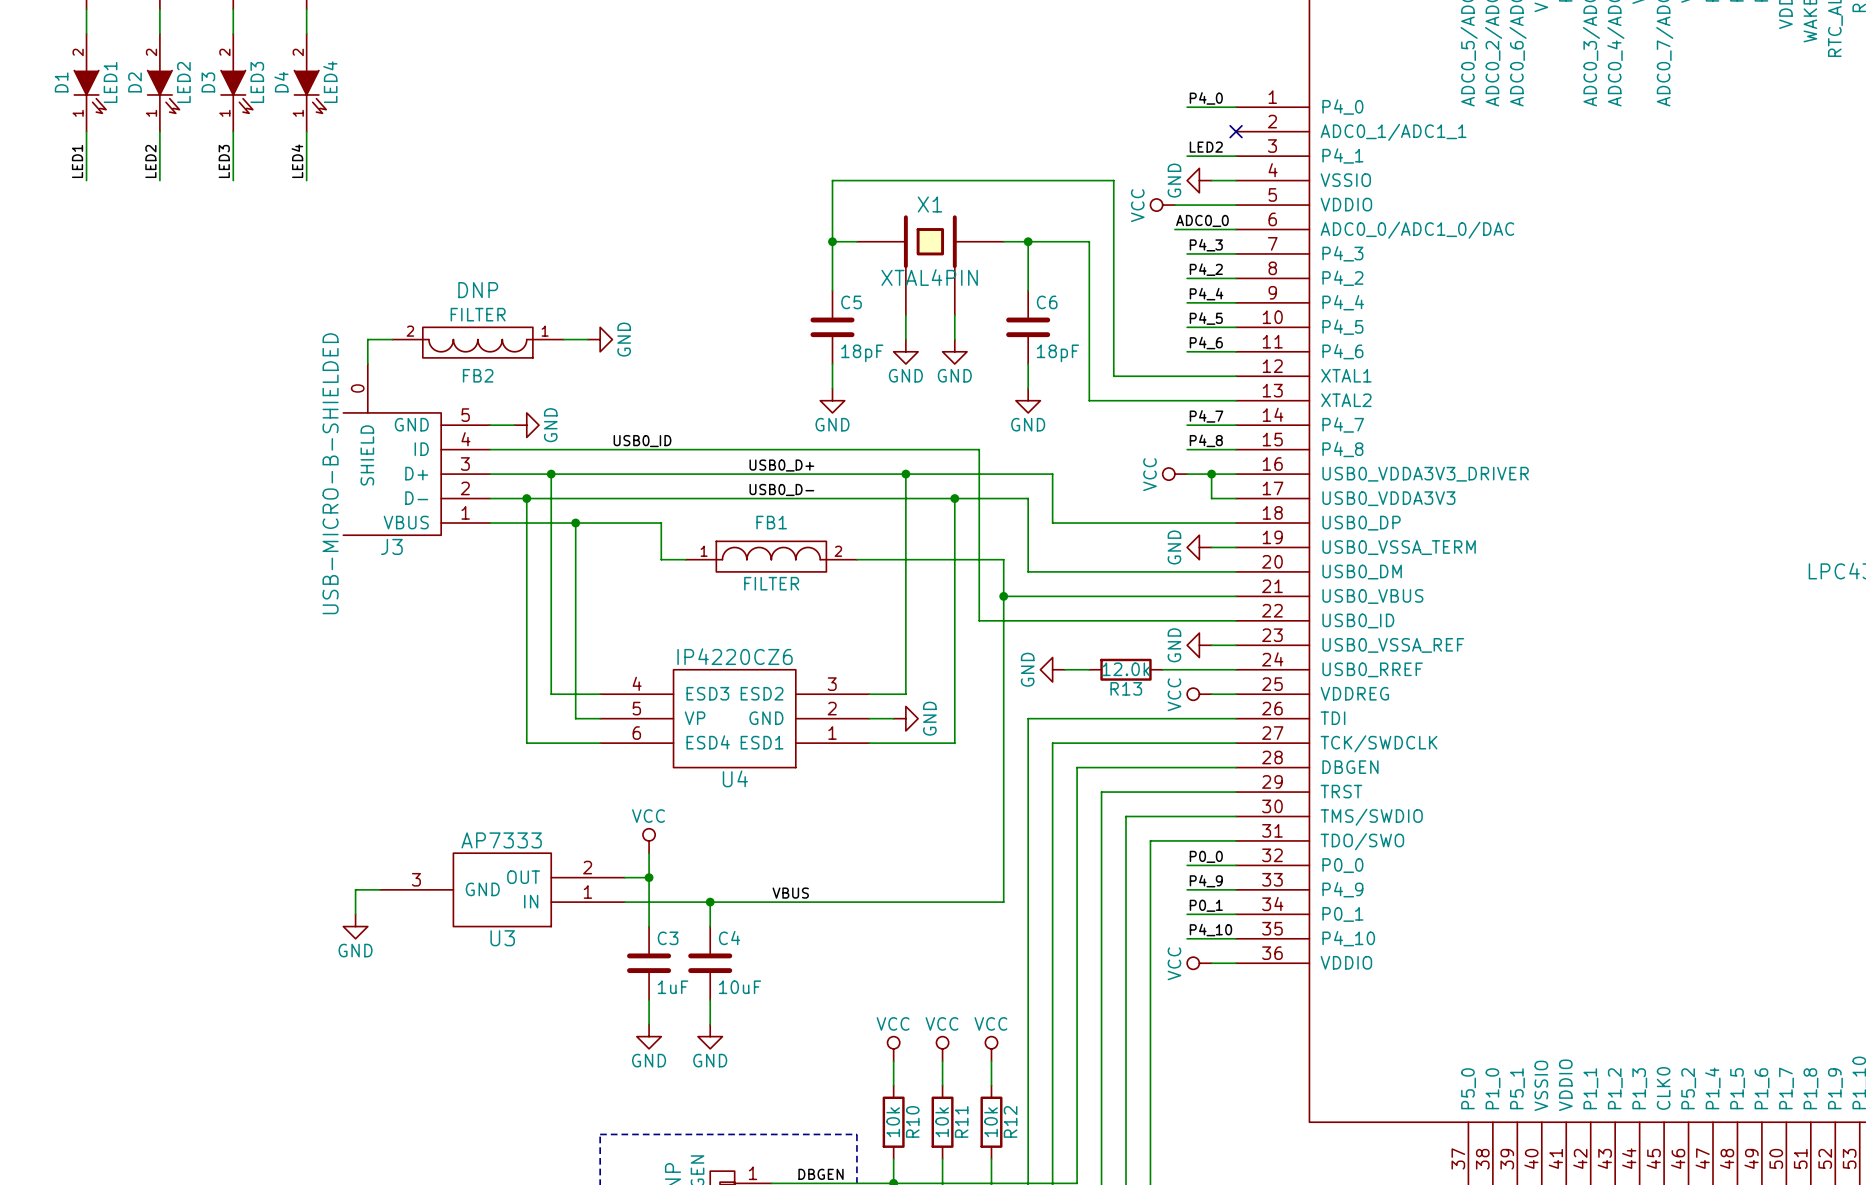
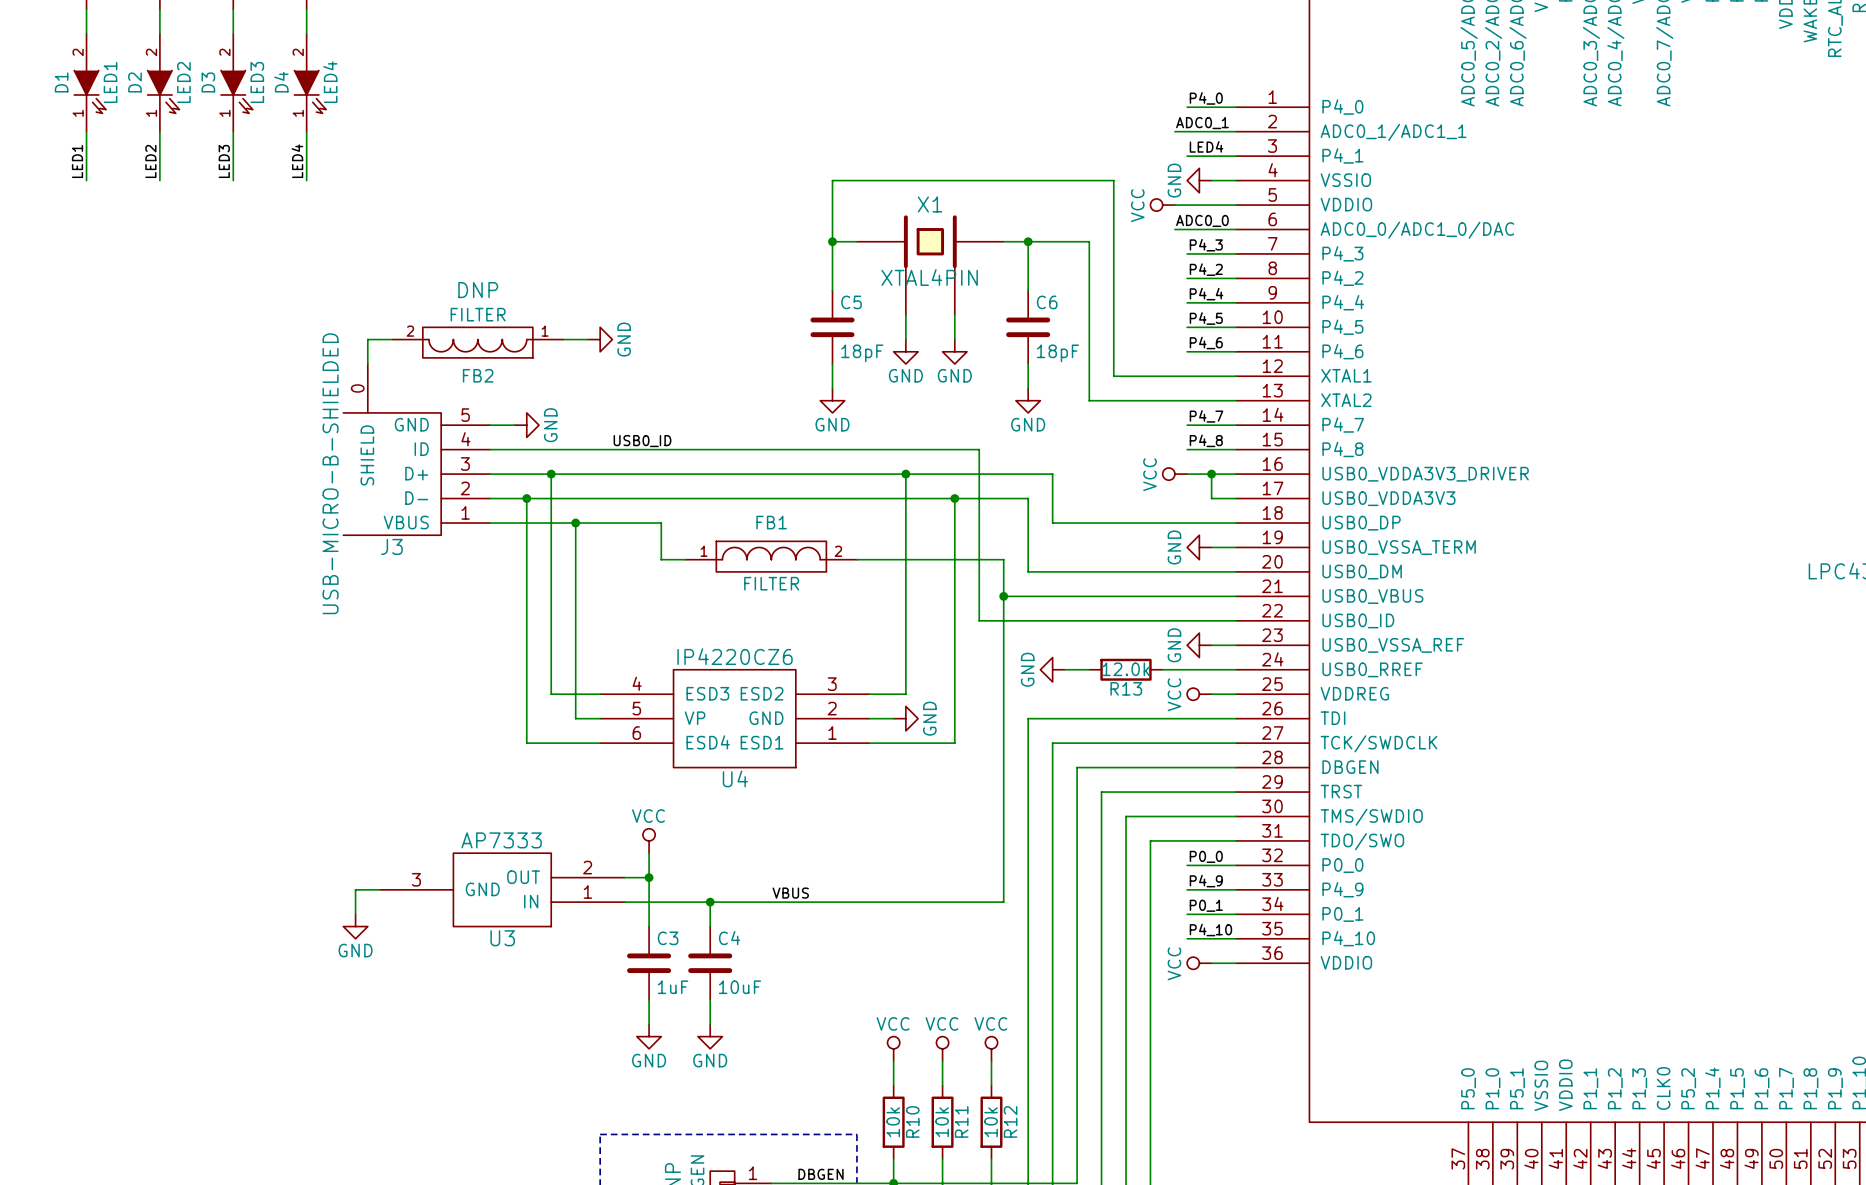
label: none -> ADC0_1 (1202, 123)
wire: none -> (1174, 131) (1236, 131)
no-connect mark: (1236, 131) -> none
label: LED2 (1206, 147) -> LED4 (1206, 146)
label: USB0_D+ (781, 465) -> none
label: USB0_D- (781, 489) -> none

